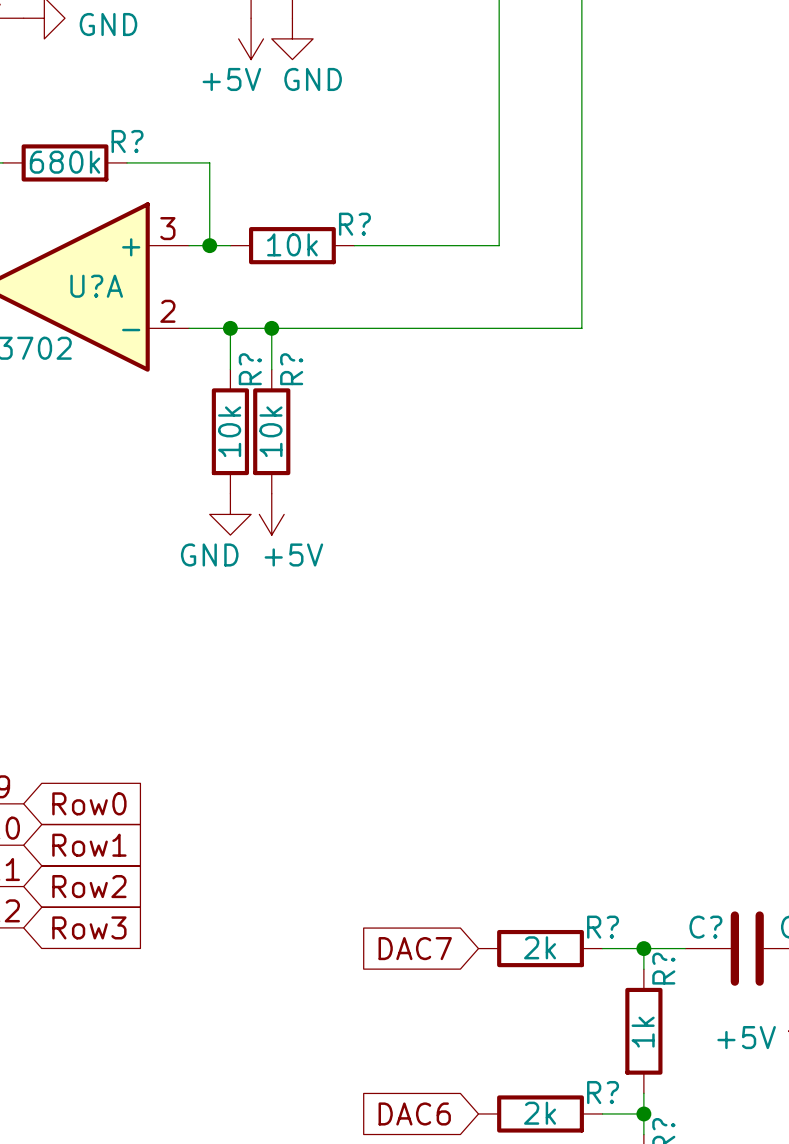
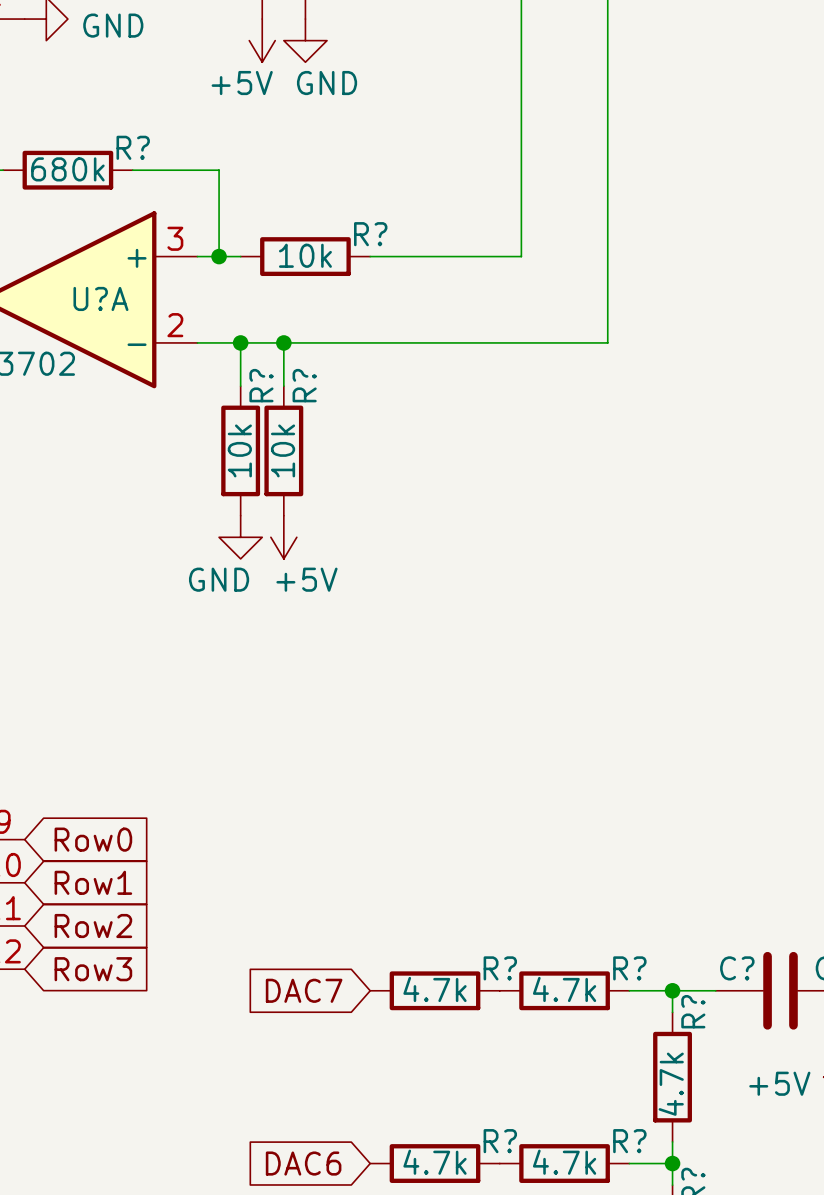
R? value: 2k (540, 947) -> 4.7k (564, 989)
global label position: DAC7 (415, 948) -> DAC7 (304, 990)
R?: none -> 4.7k (435, 990)
R? value: 1k (643, 1032) -> 4.7k (671, 1084)
global label position: DAC6 (414, 1113) -> DAC6 (303, 1163)
R?: none -> 4.7k (435, 1163)
R? value: 2k (540, 1113) -> 4.7k (564, 1162)

